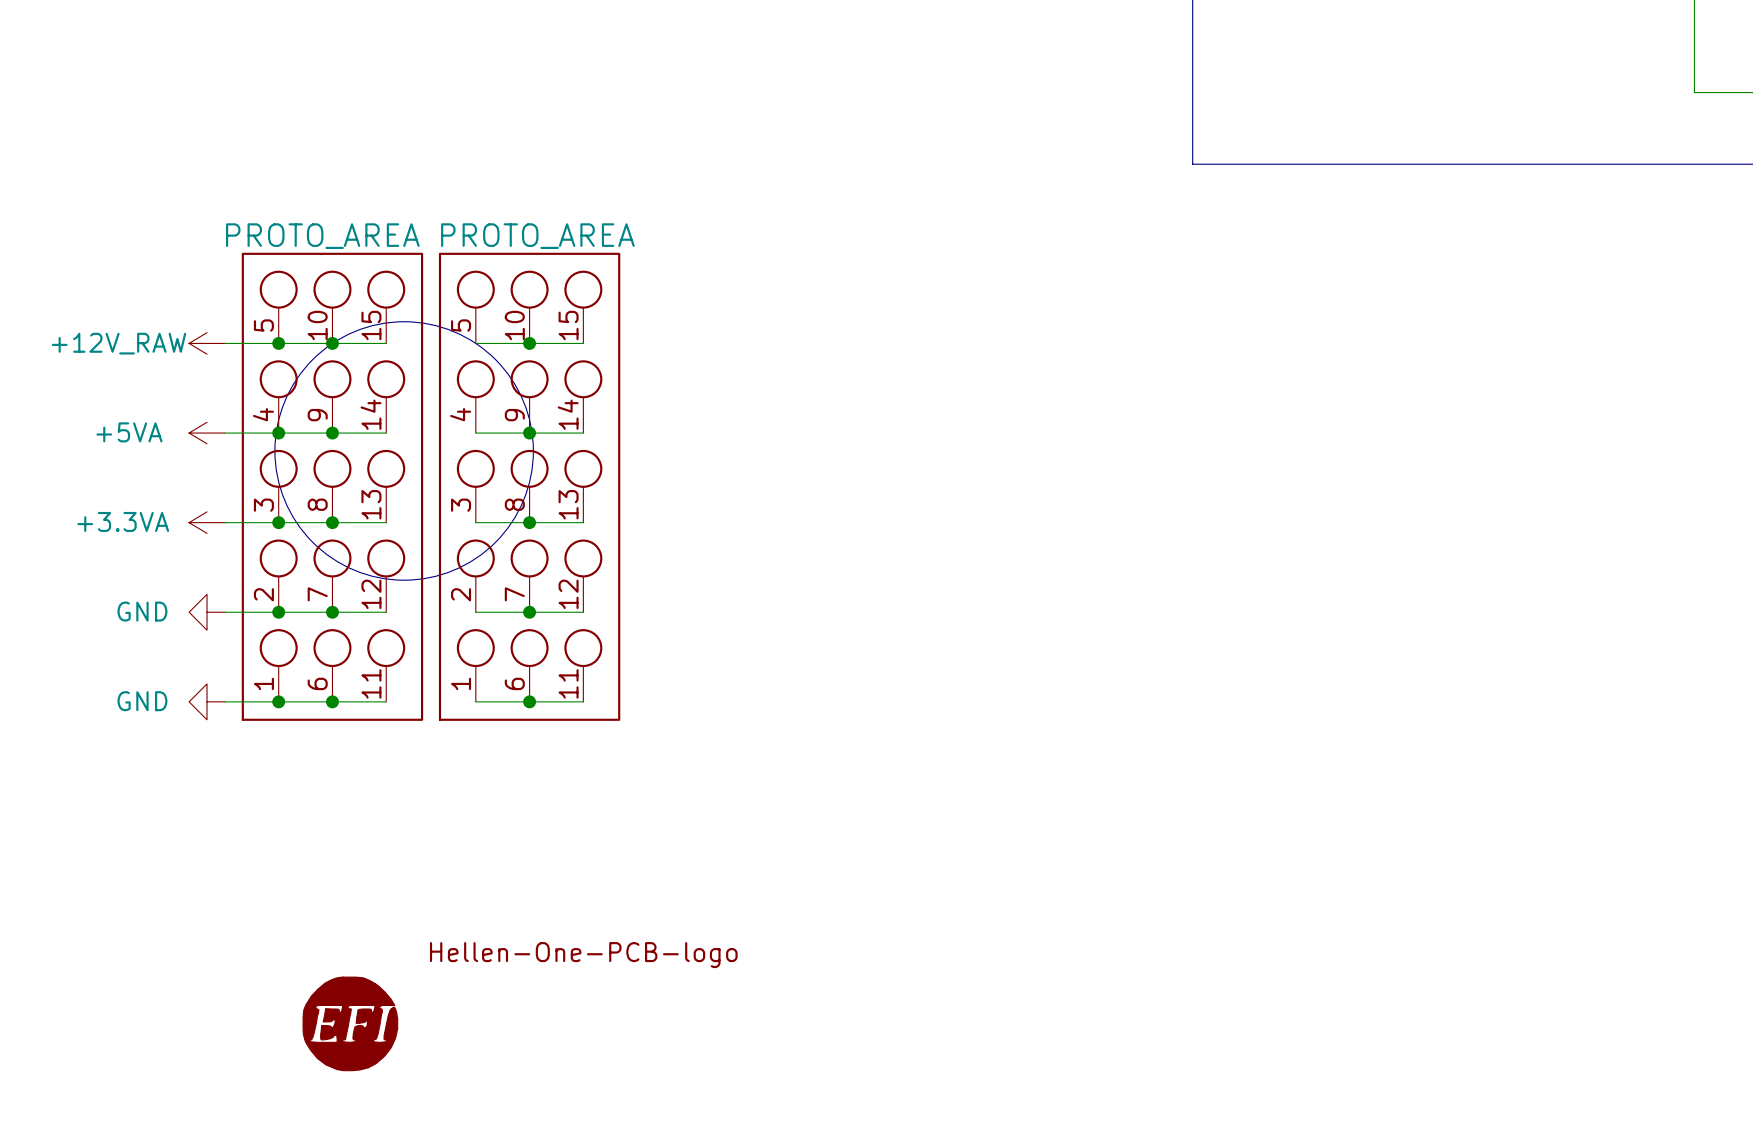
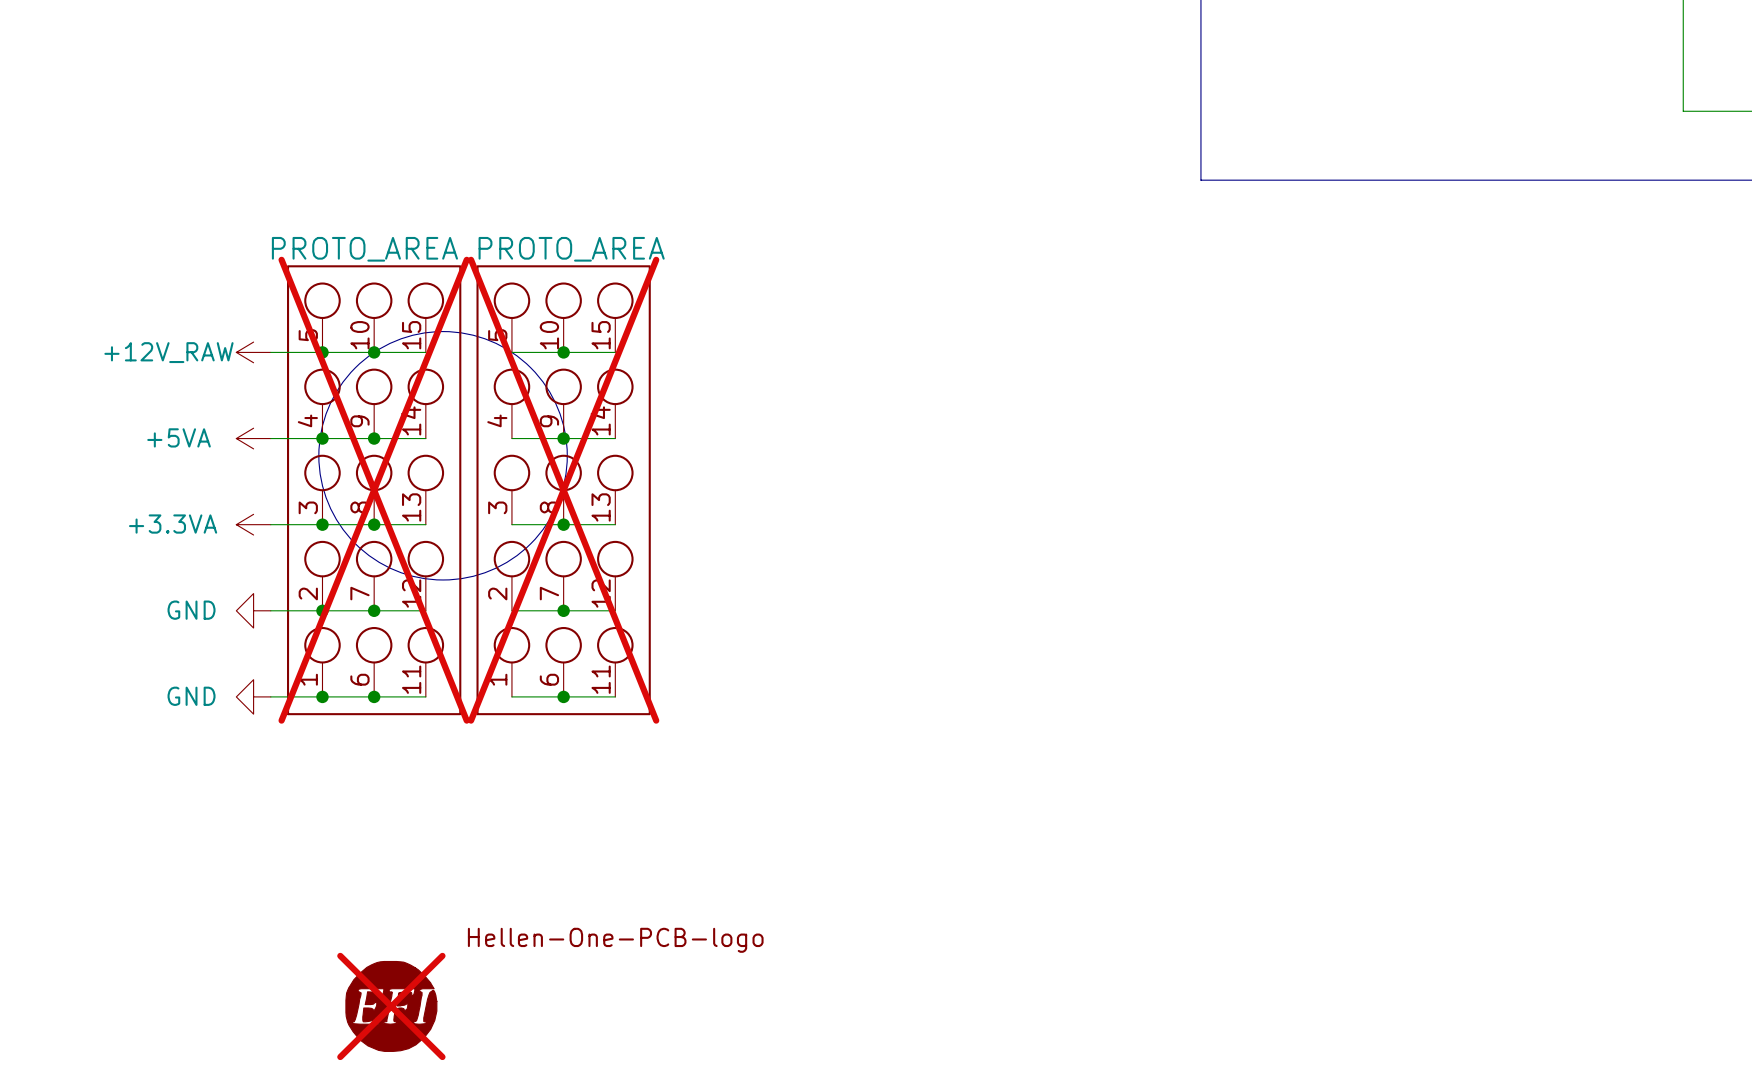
part do-not-place cross: none -> (374, 490)
part do-not-place cross: none -> (563, 490)
part do-not-place cross: none -> (391, 1006)

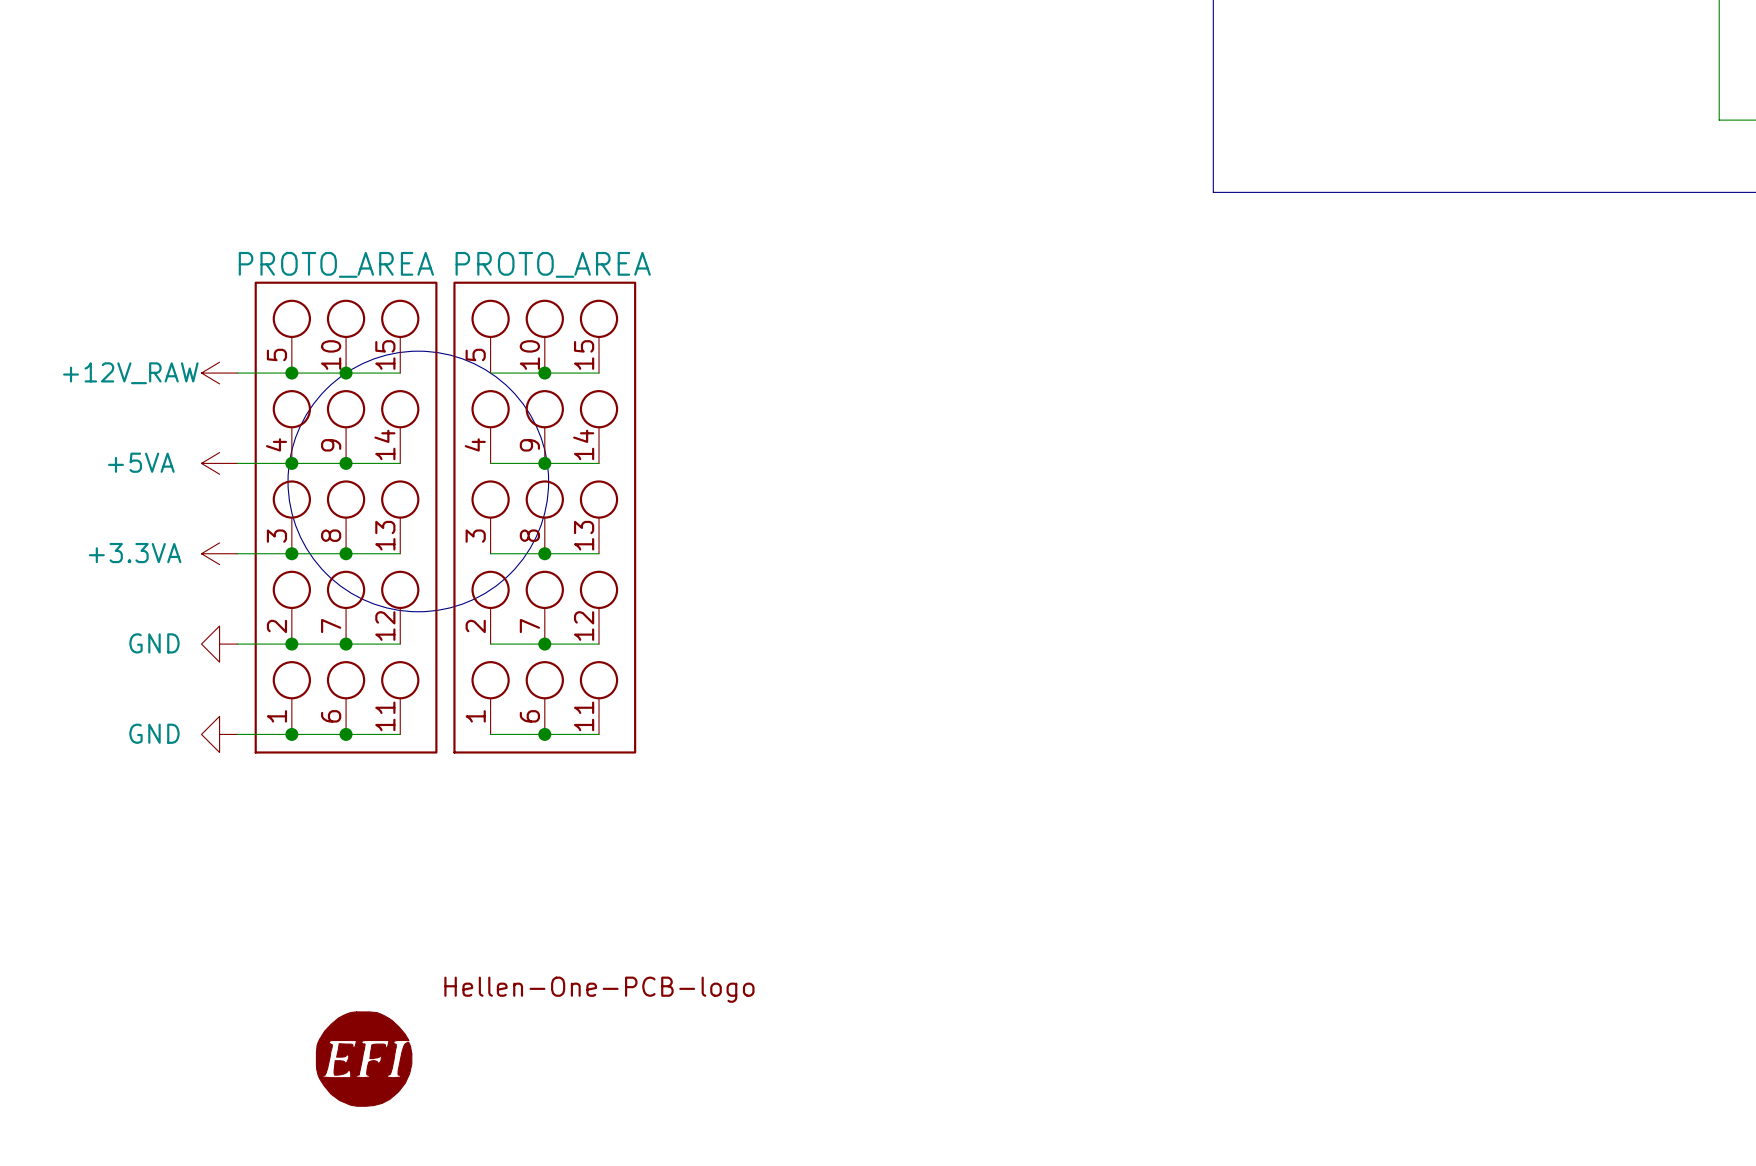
part do-not-place cross: (374, 490) -> none
part do-not-place cross: (563, 490) -> none
part do-not-place cross: (391, 1006) -> none

